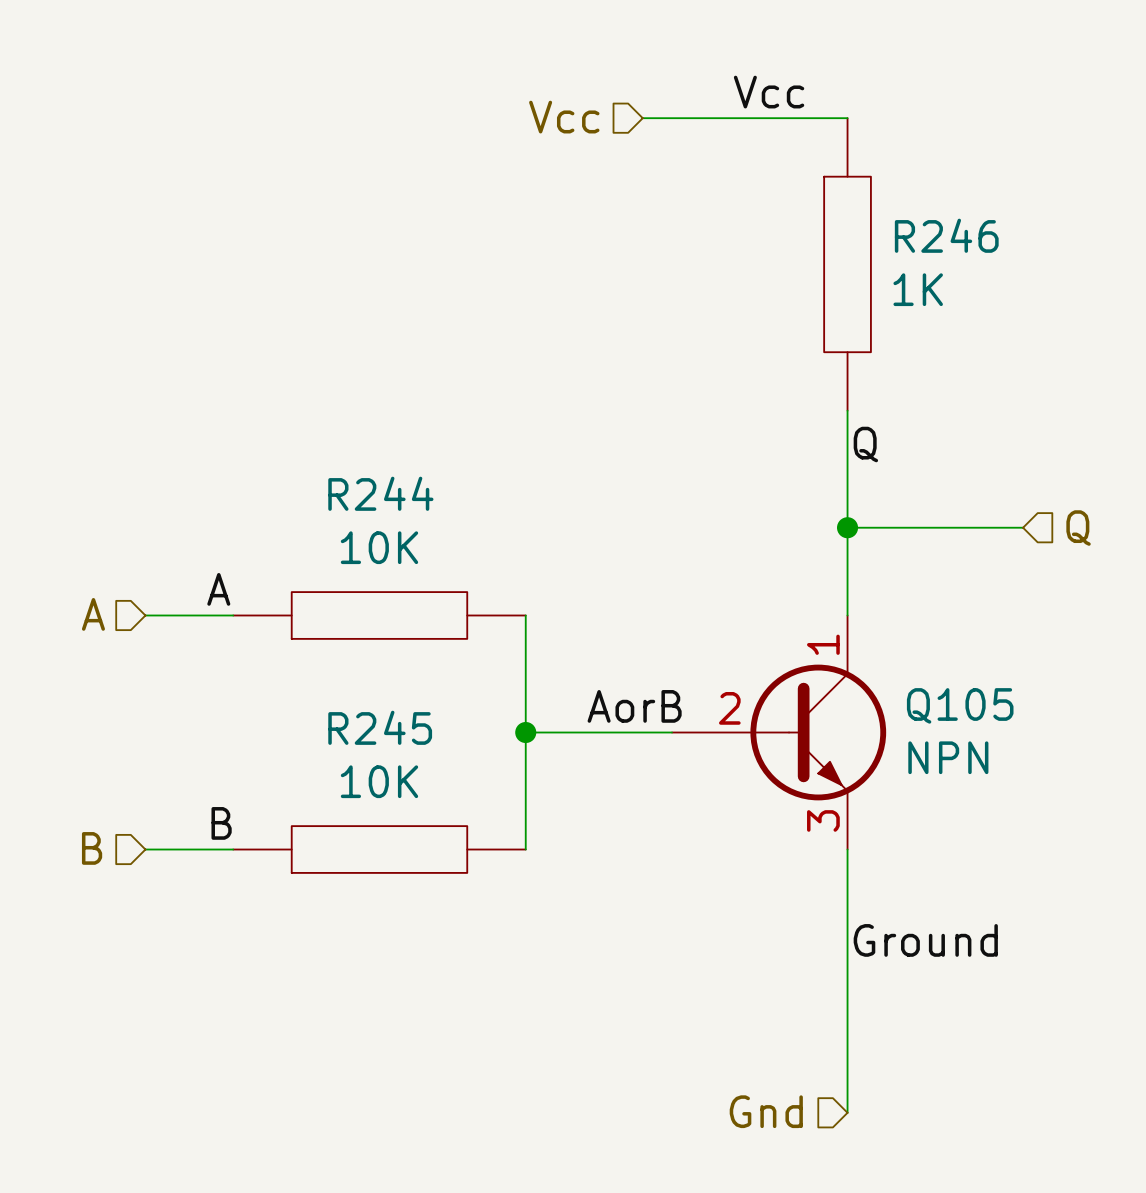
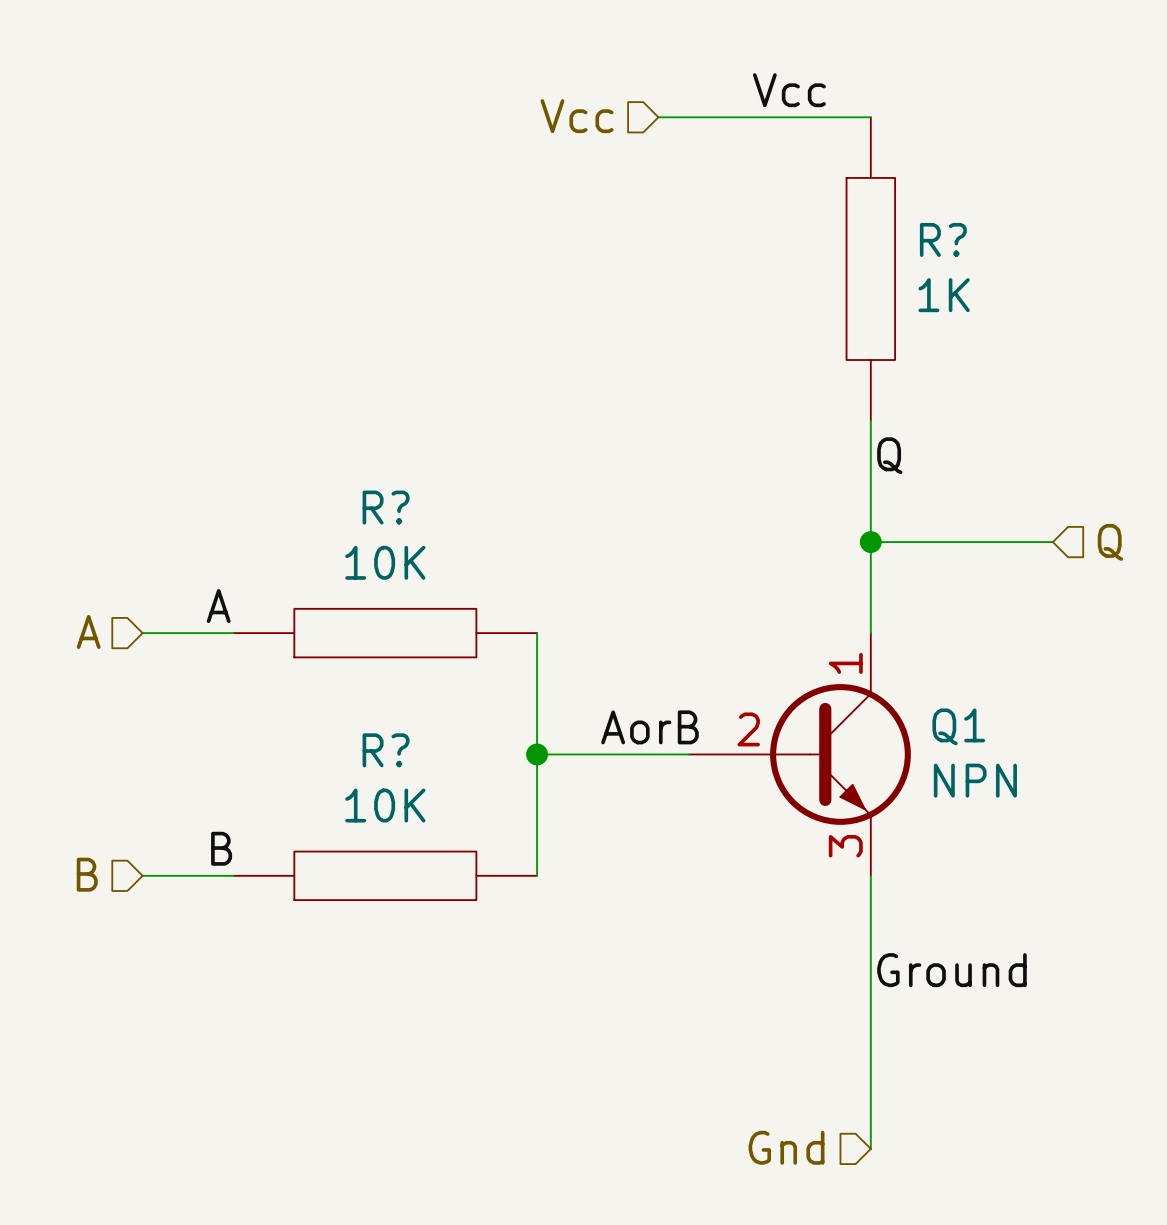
R246 name: R246 (946, 235) -> R? (943, 239)
R244 name: R244 (380, 493) -> R? (386, 507)
Q105 name: Q105 (960, 705) -> Q1 (958, 726)
R245 name: R245 (380, 727) -> R? (386, 750)

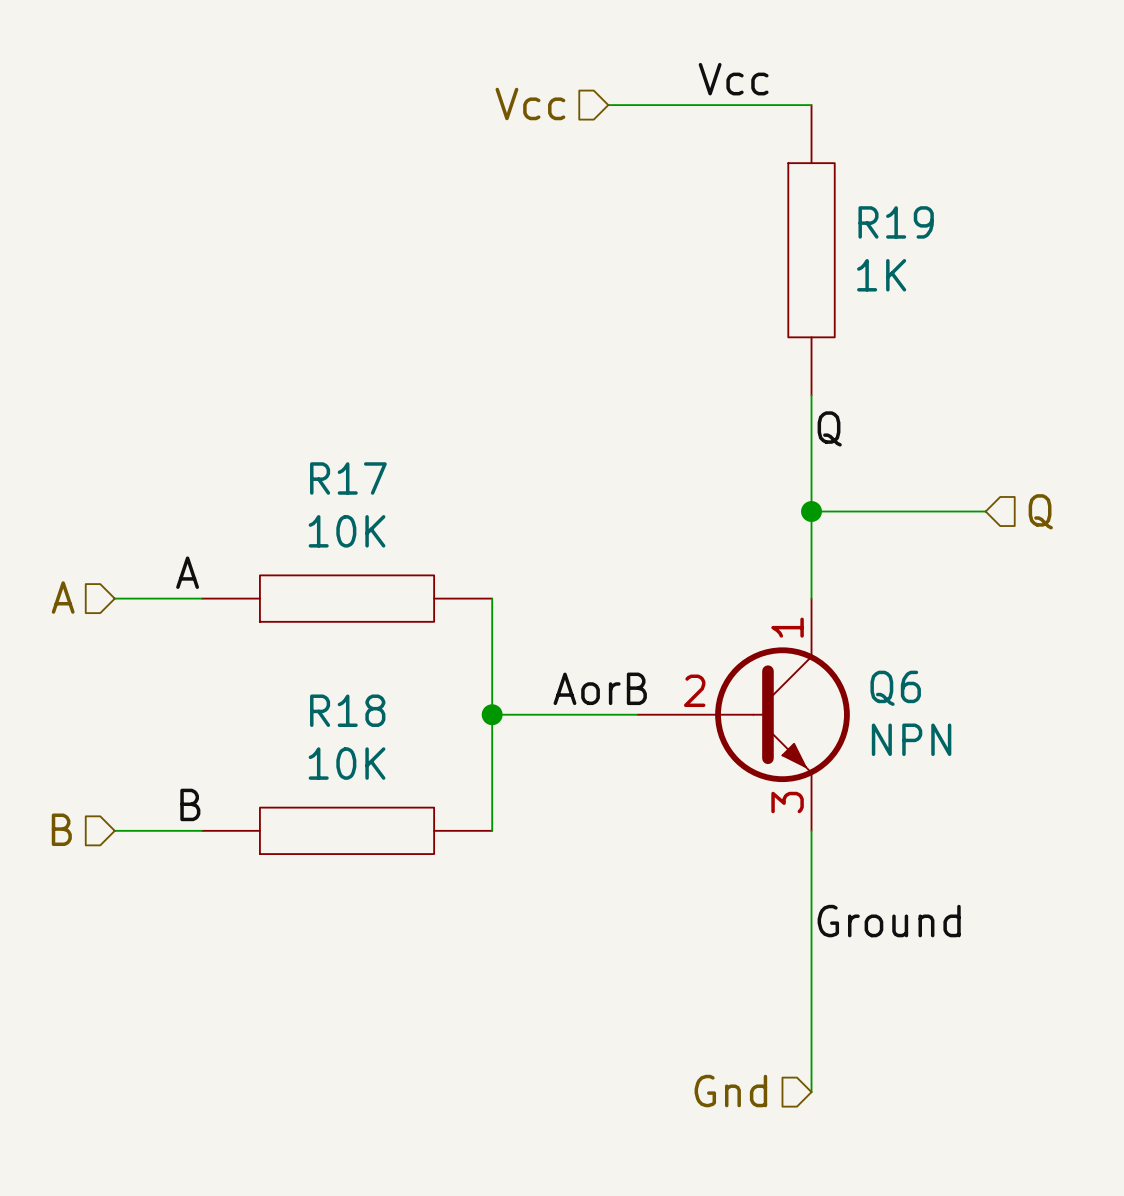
R? name: R? (943, 239) -> R19 (896, 222)
R? name: R? (386, 507) -> R17 (348, 478)
Q1 name: Q1 (958, 726) -> Q6 (895, 688)
R? name: R? (386, 750) -> R18 (347, 710)

